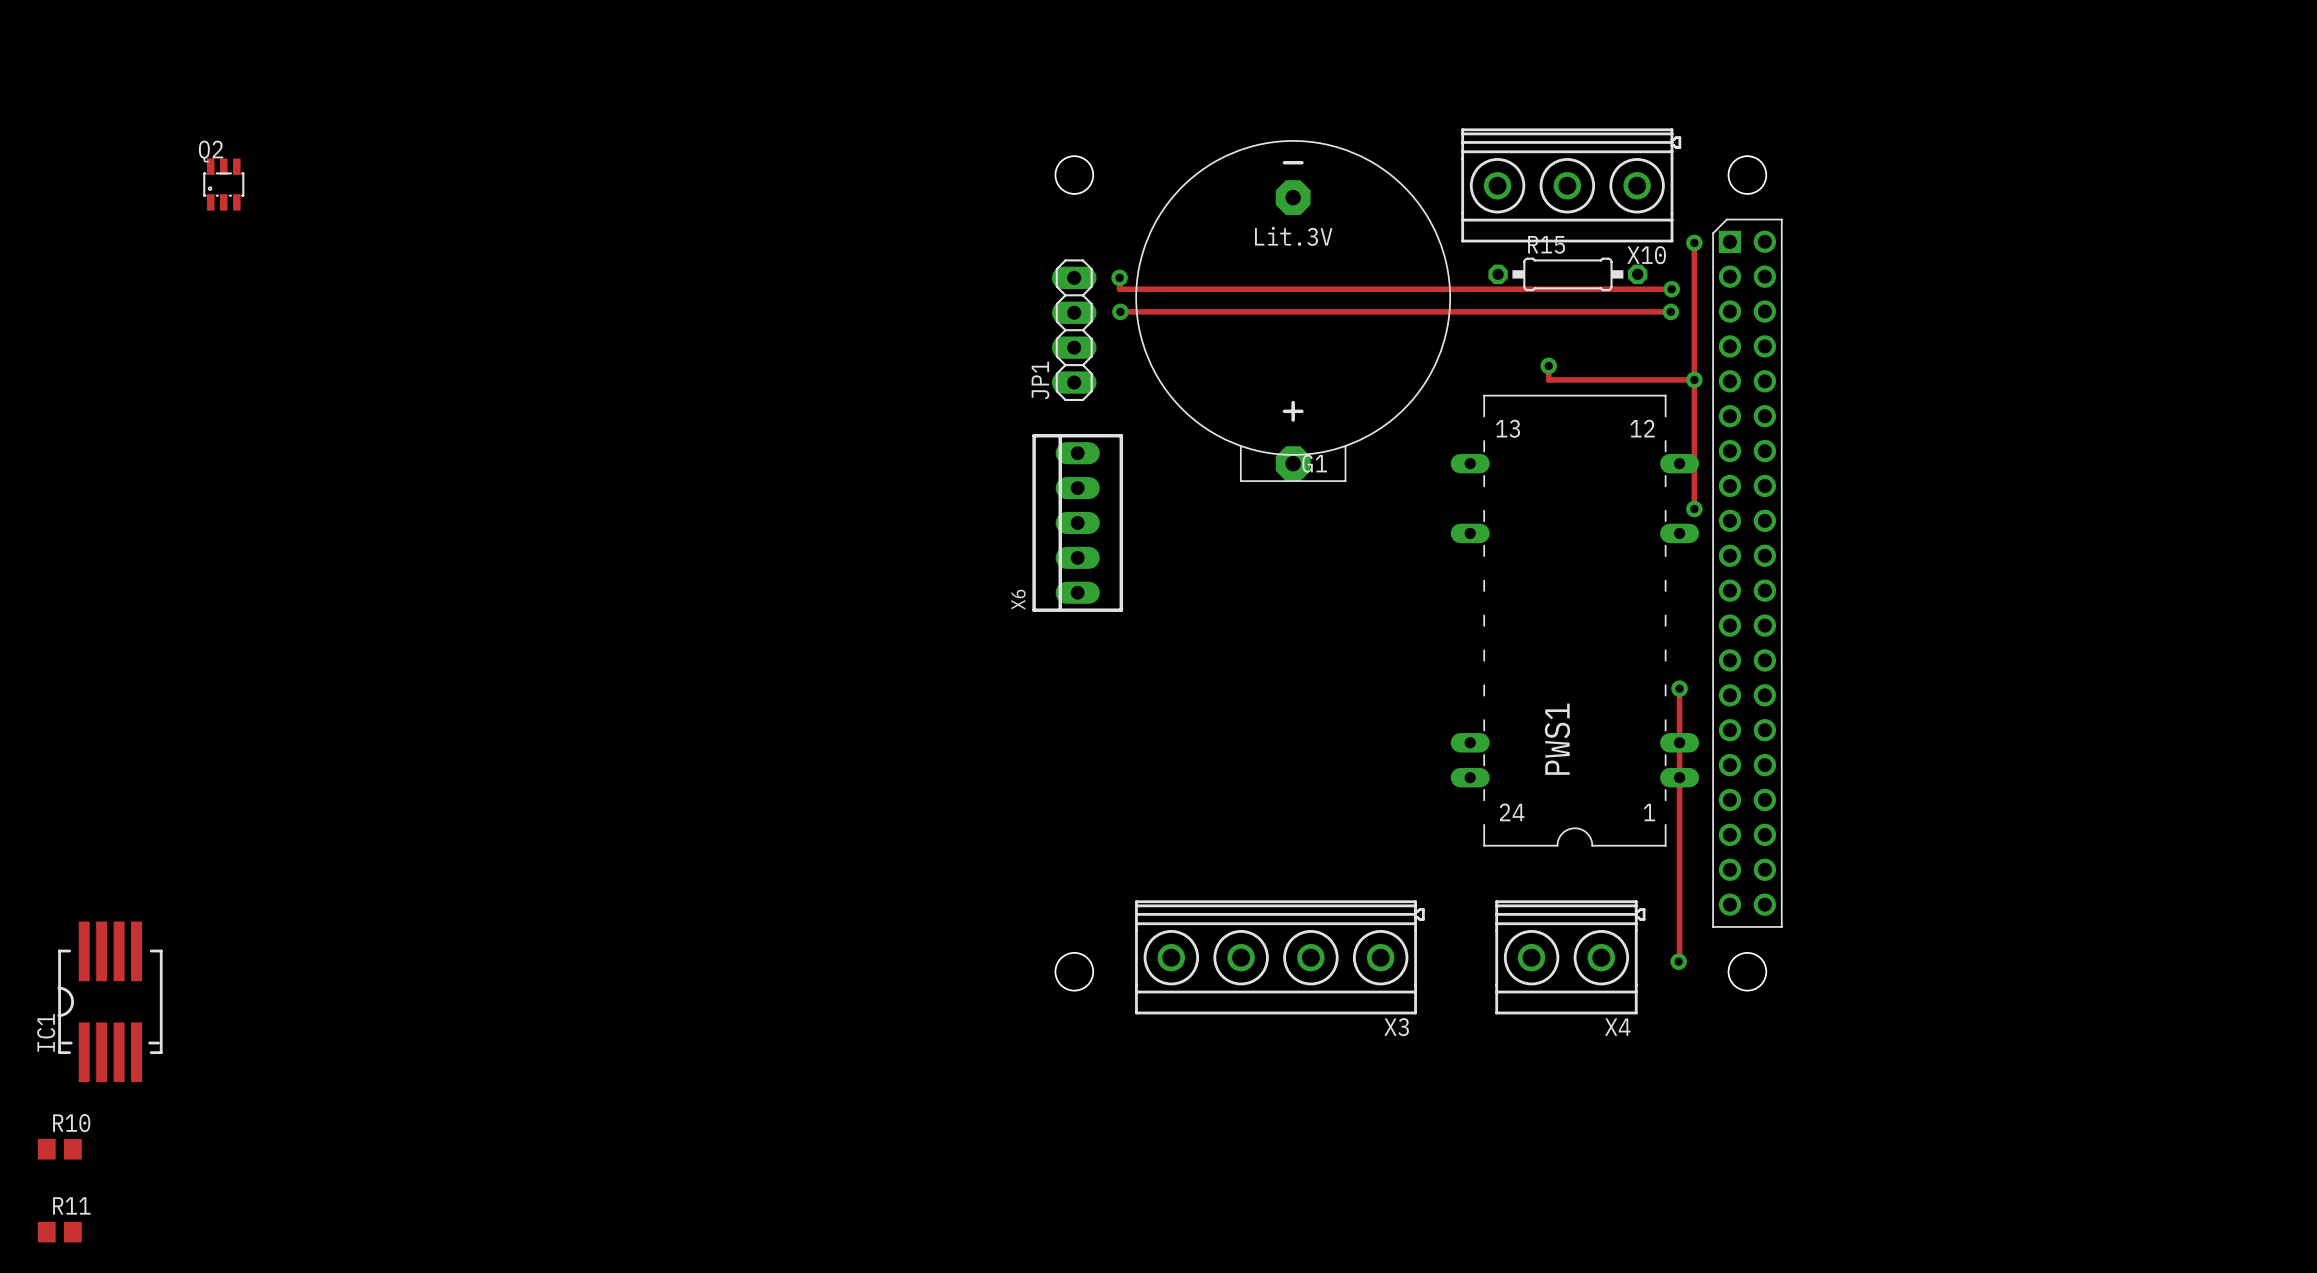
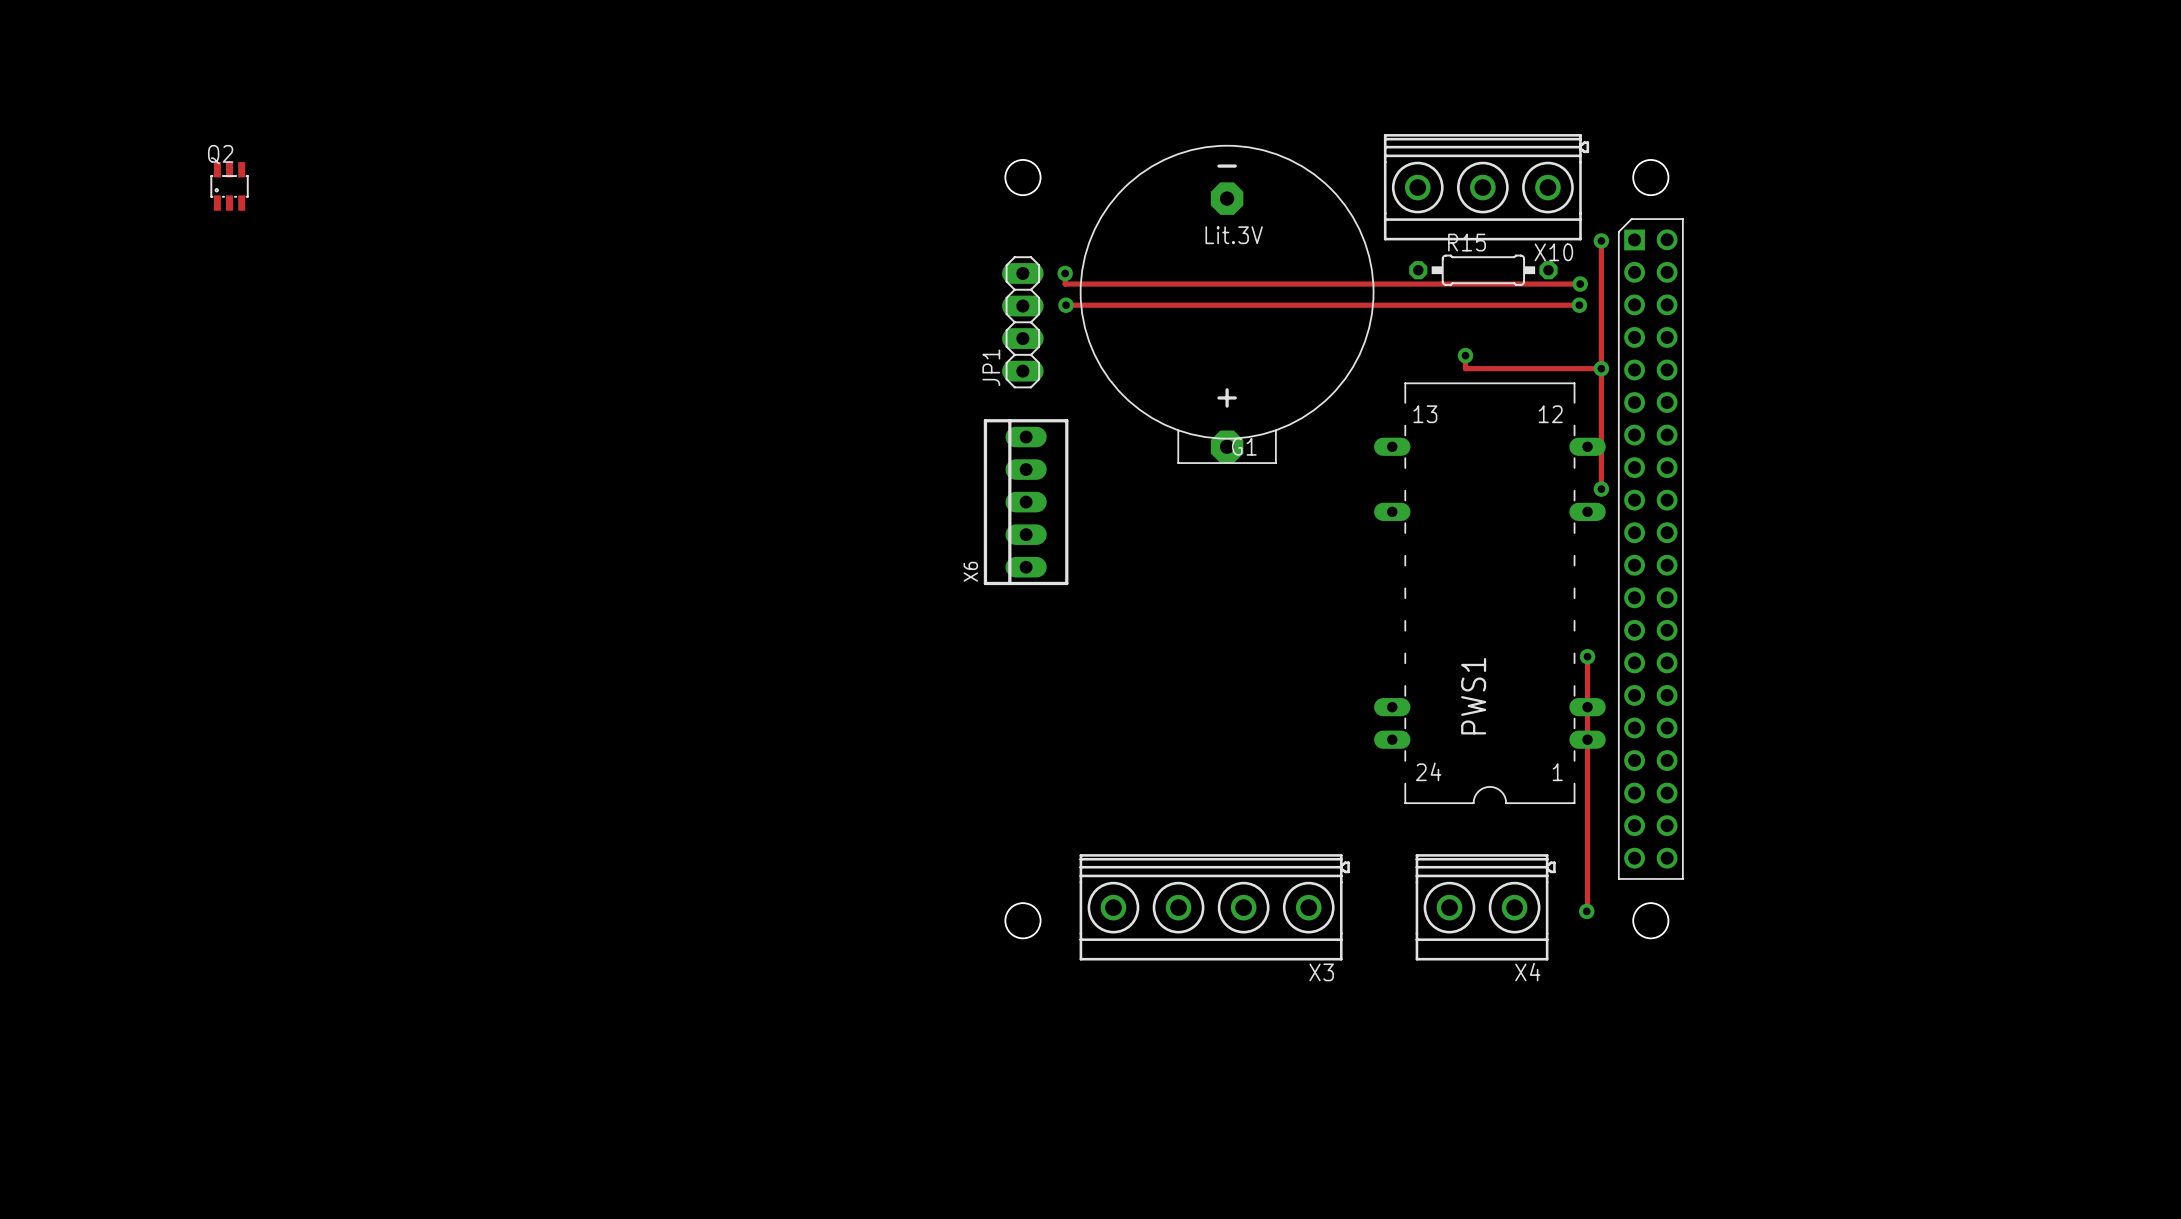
IC1: (110, 1001) -> none
R10: (59, 1149) -> none
R11: (59, 1232) -> none

